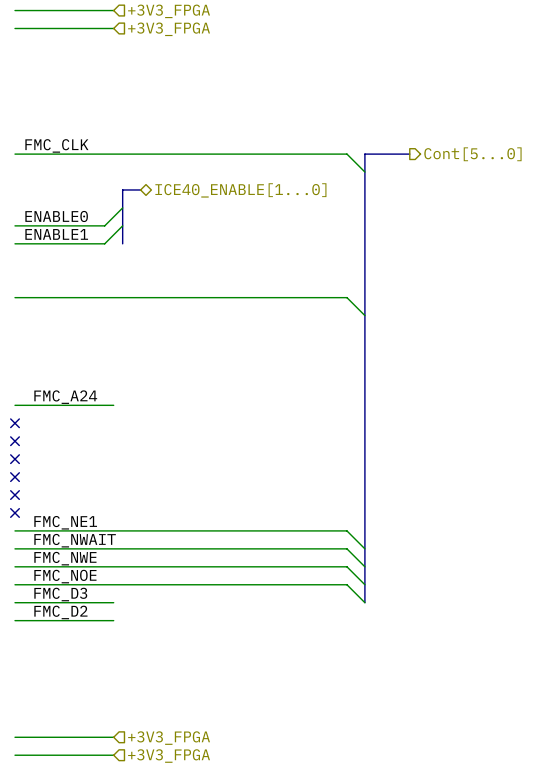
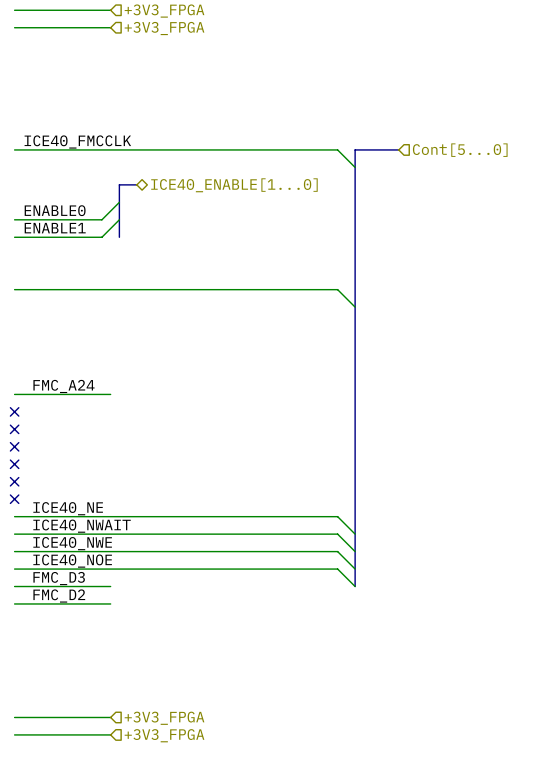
label: FMC_CLK (56, 145) -> ICE40_FMCCLK (77, 142)
hierarchical label shape: output (472, 154) -> input (460, 150)
label: FMC_NE1 (65, 522) -> ICE40_NE (68, 508)
label: FMC_NWAIT (75, 540) -> ICE40_NWAIT (82, 526)
label: FMC_NWE (65, 558) -> ICE40_NWE (72, 543)
label: FMC_NOE (65, 576) -> ICE40_NOE (72, 561)

